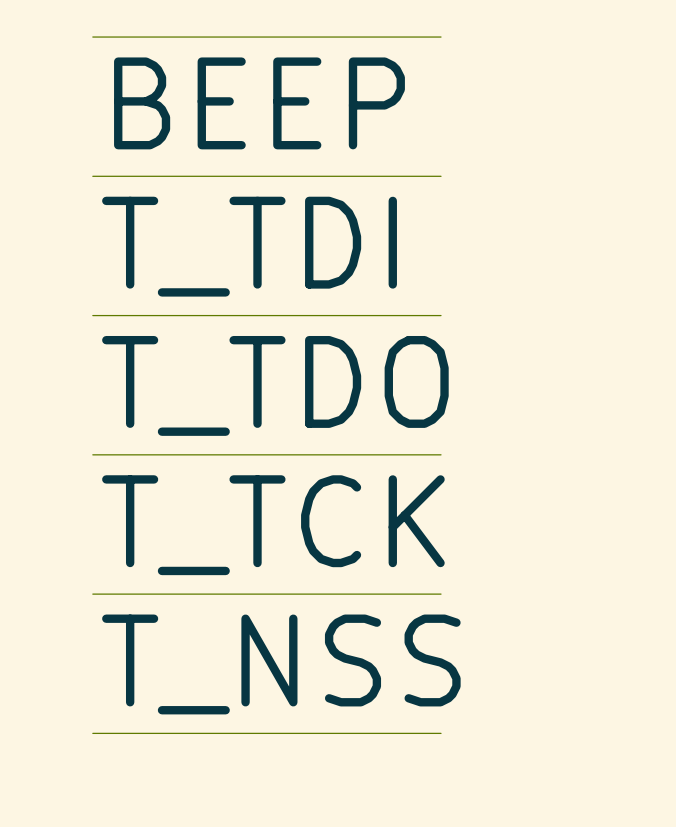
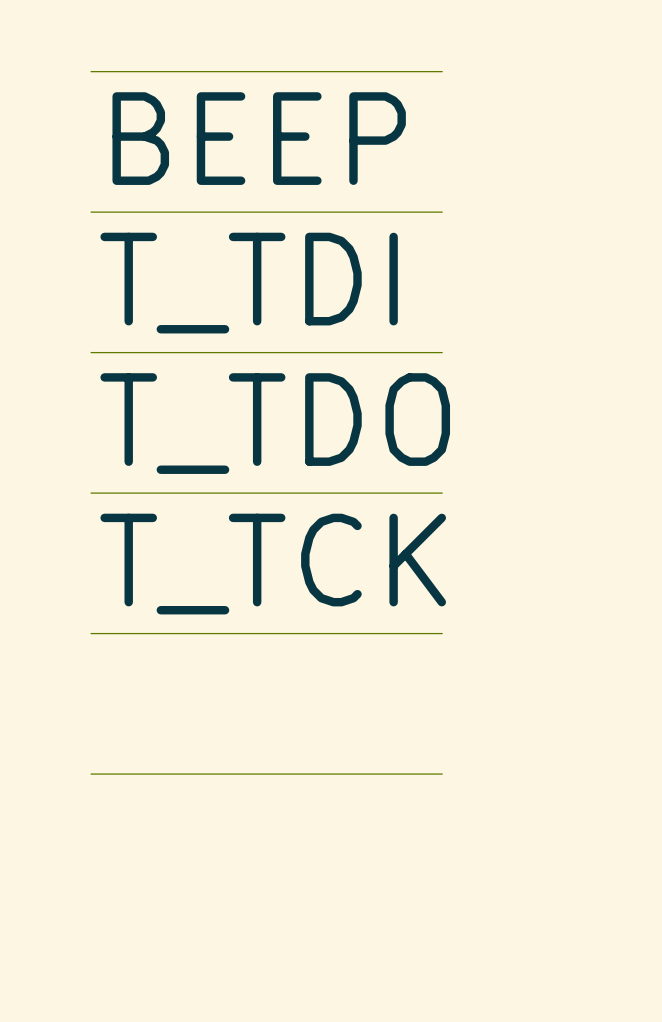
label: T_NSS (281, 664) -> none

